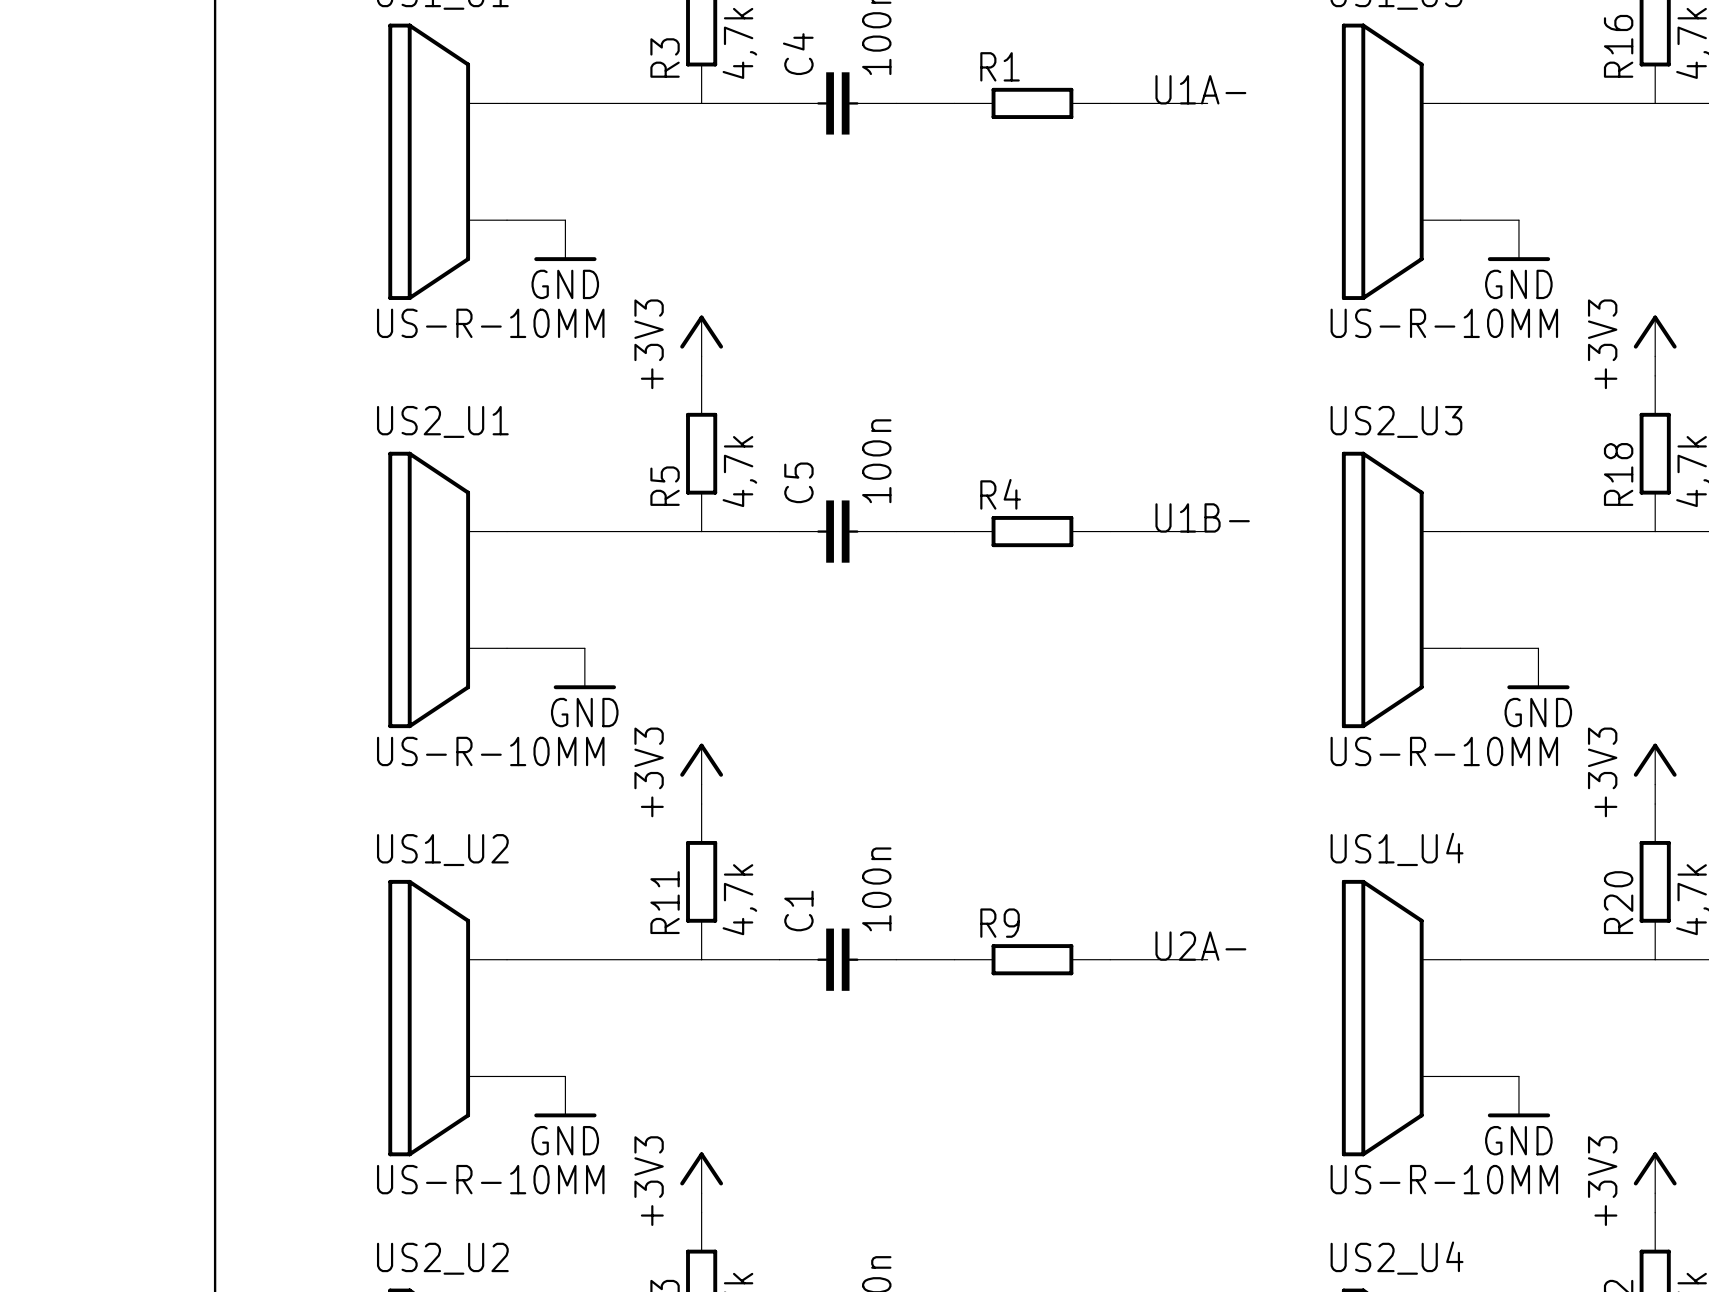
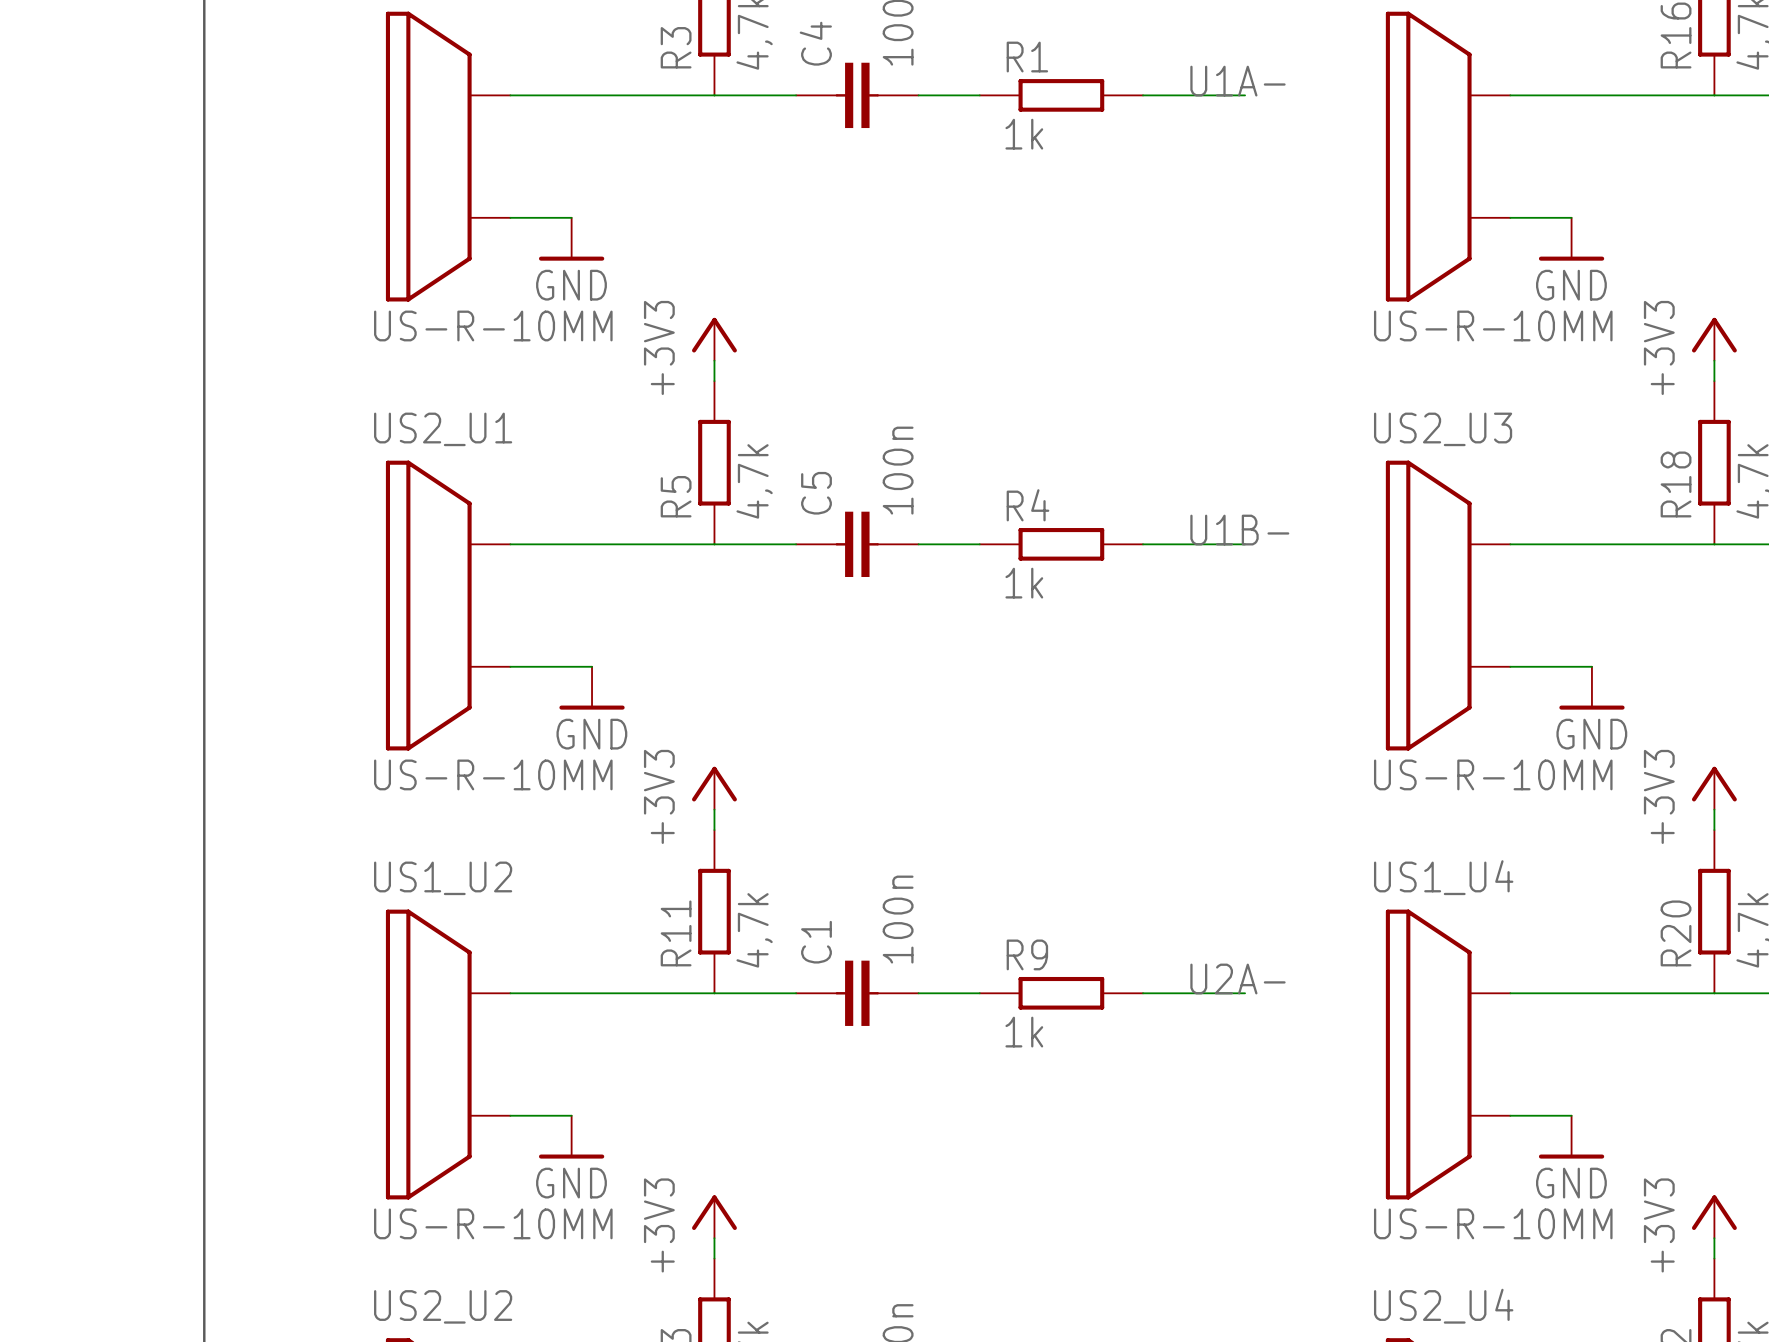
R1 value: none -> 1k (1024, 134)
R4 value: none -> 1k (1024, 583)
R9 value: none -> 1k (1024, 1032)

